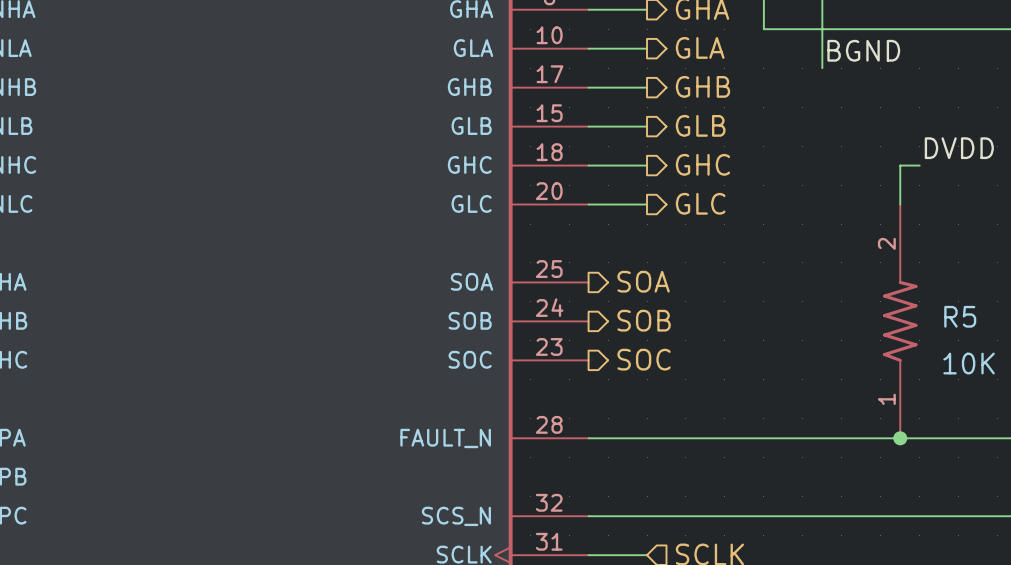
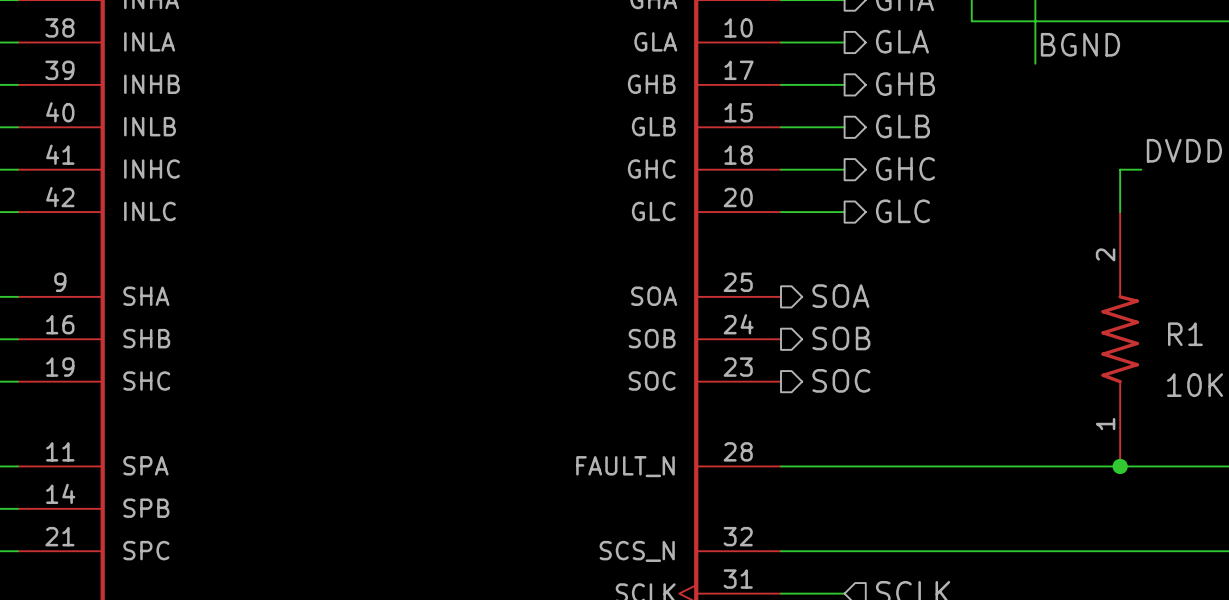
R5 name: R5 (960, 316) -> R1 (1185, 334)

